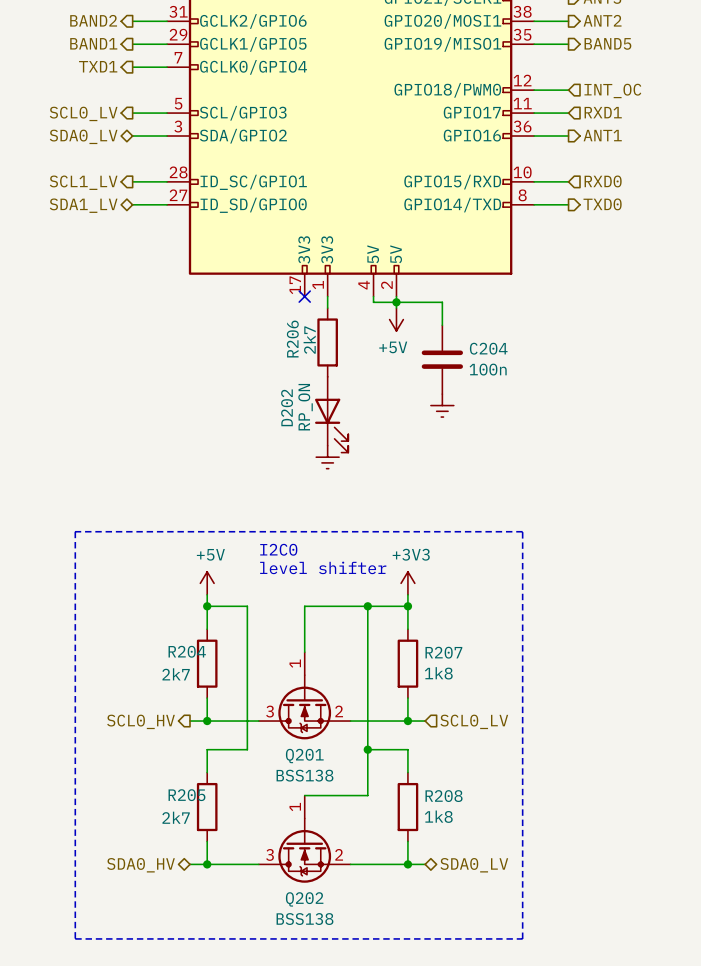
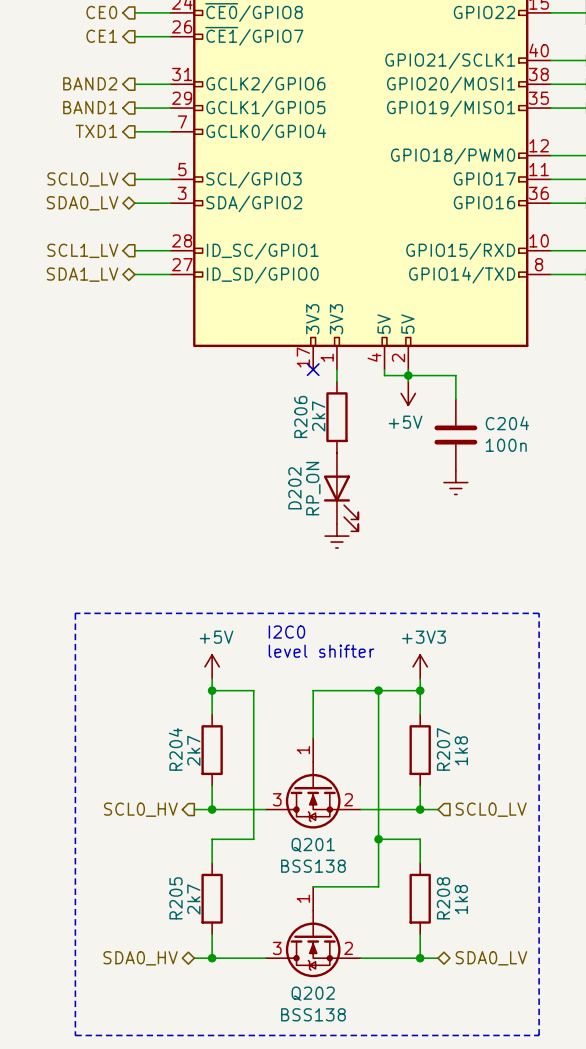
R204 name rotation: 0° (187, 651) -> 90° counterclockwise (175, 749)
R207 name rotation: 0° (443, 652) -> 90° counterclockwise (443, 749)
R207 value rotation: 0° (438, 673) -> 90° counterclockwise (461, 750)
R204 value rotation: 0° (176, 674) -> 90° counterclockwise (193, 750)
R205 name rotation: 0° (186, 795) -> 90° counterclockwise (176, 898)
R208 name rotation: 0° (444, 796) -> 90° counterclockwise (443, 898)
R208 value rotation: 0° (438, 816) -> 90° counterclockwise (461, 899)
R205 value rotation: 0° (176, 817) -> 90° counterclockwise (193, 899)

